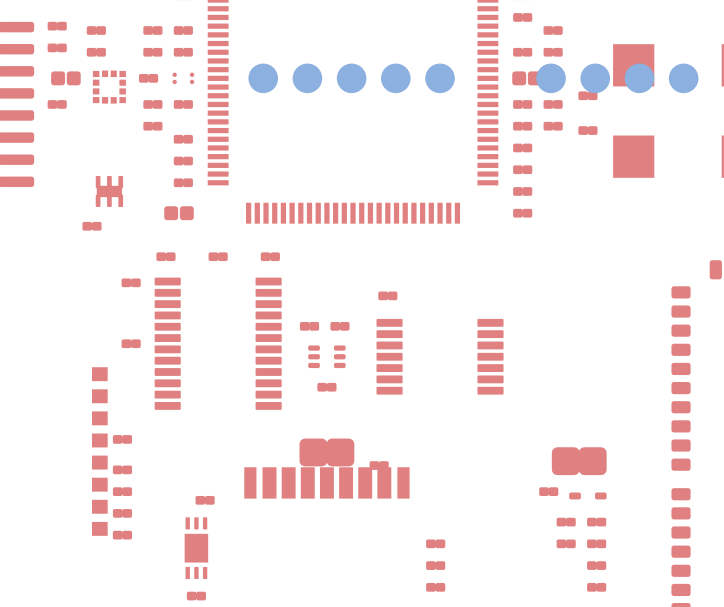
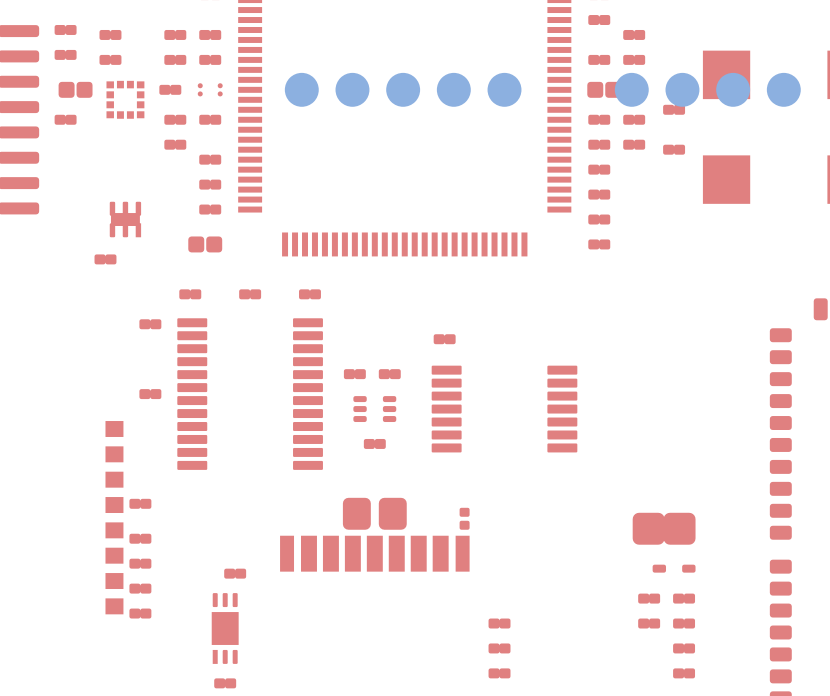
part footprint: [299, 438, 355, 467] -> [342, 497, 407, 530]
part: none -> (464, 518)
part: (379, 465) -> none
part: (548, 491) -> none

